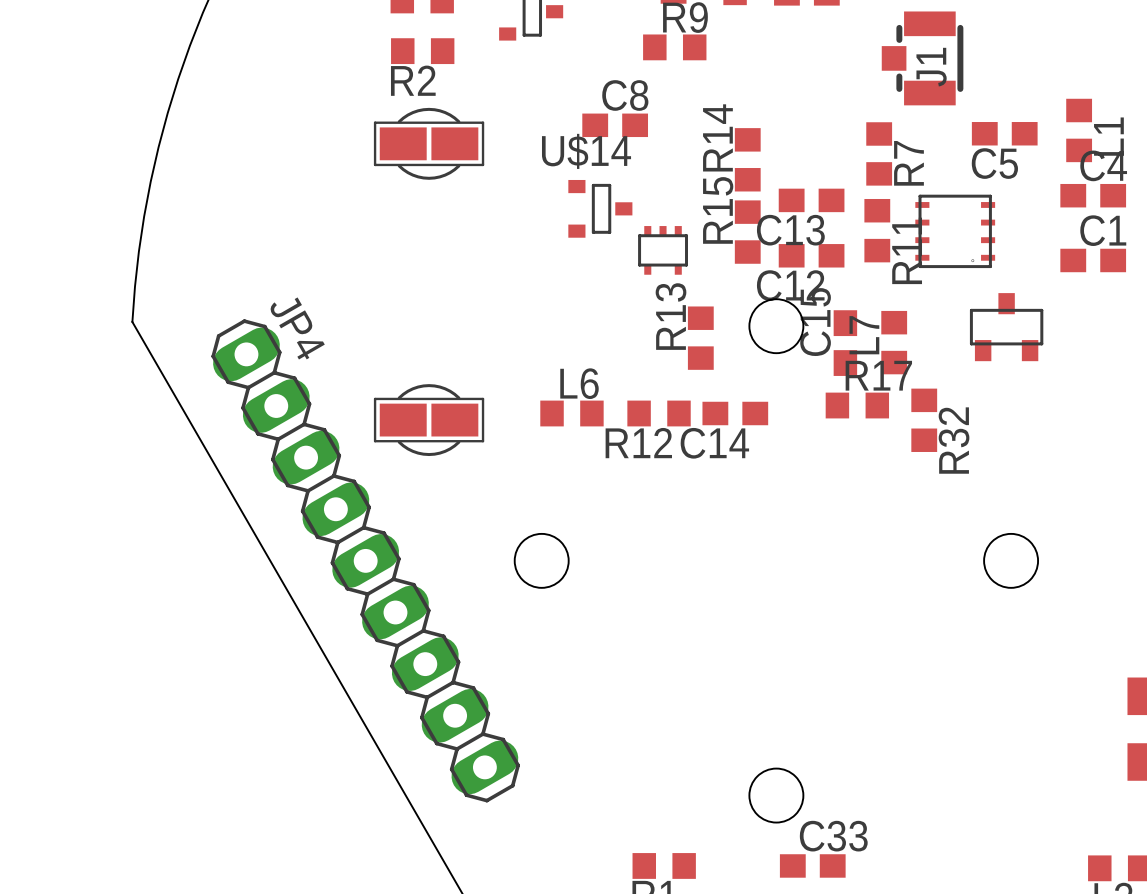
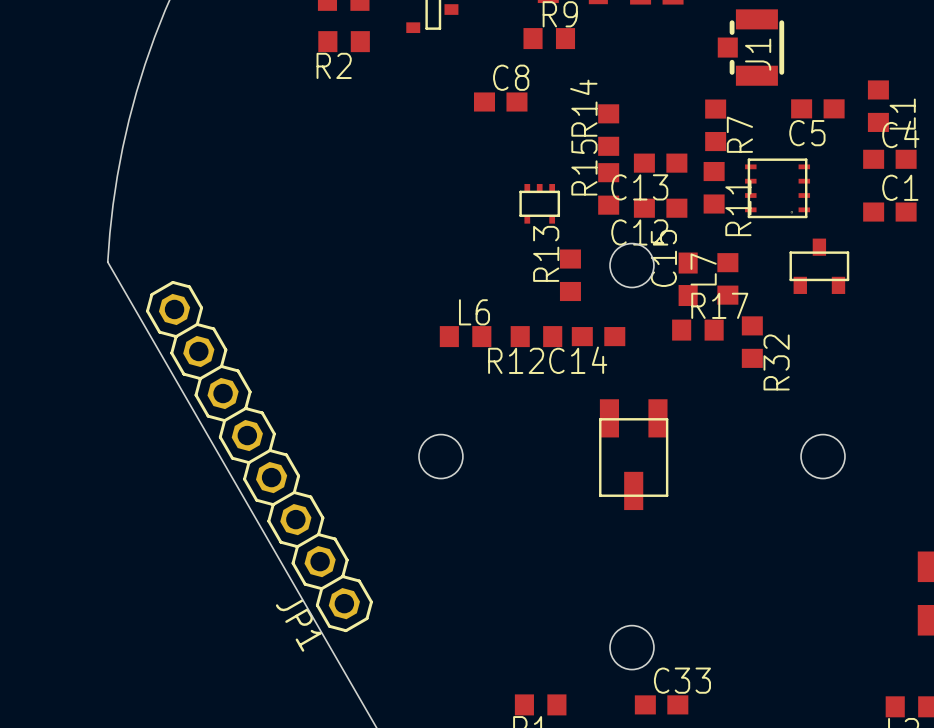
part: (429, 143) -> none
U$14: (600, 208) -> none
part: (429, 420) -> none
part: none -> (633, 454)
JP1: none -> (259, 456)
JP4: (365, 560) -> none

